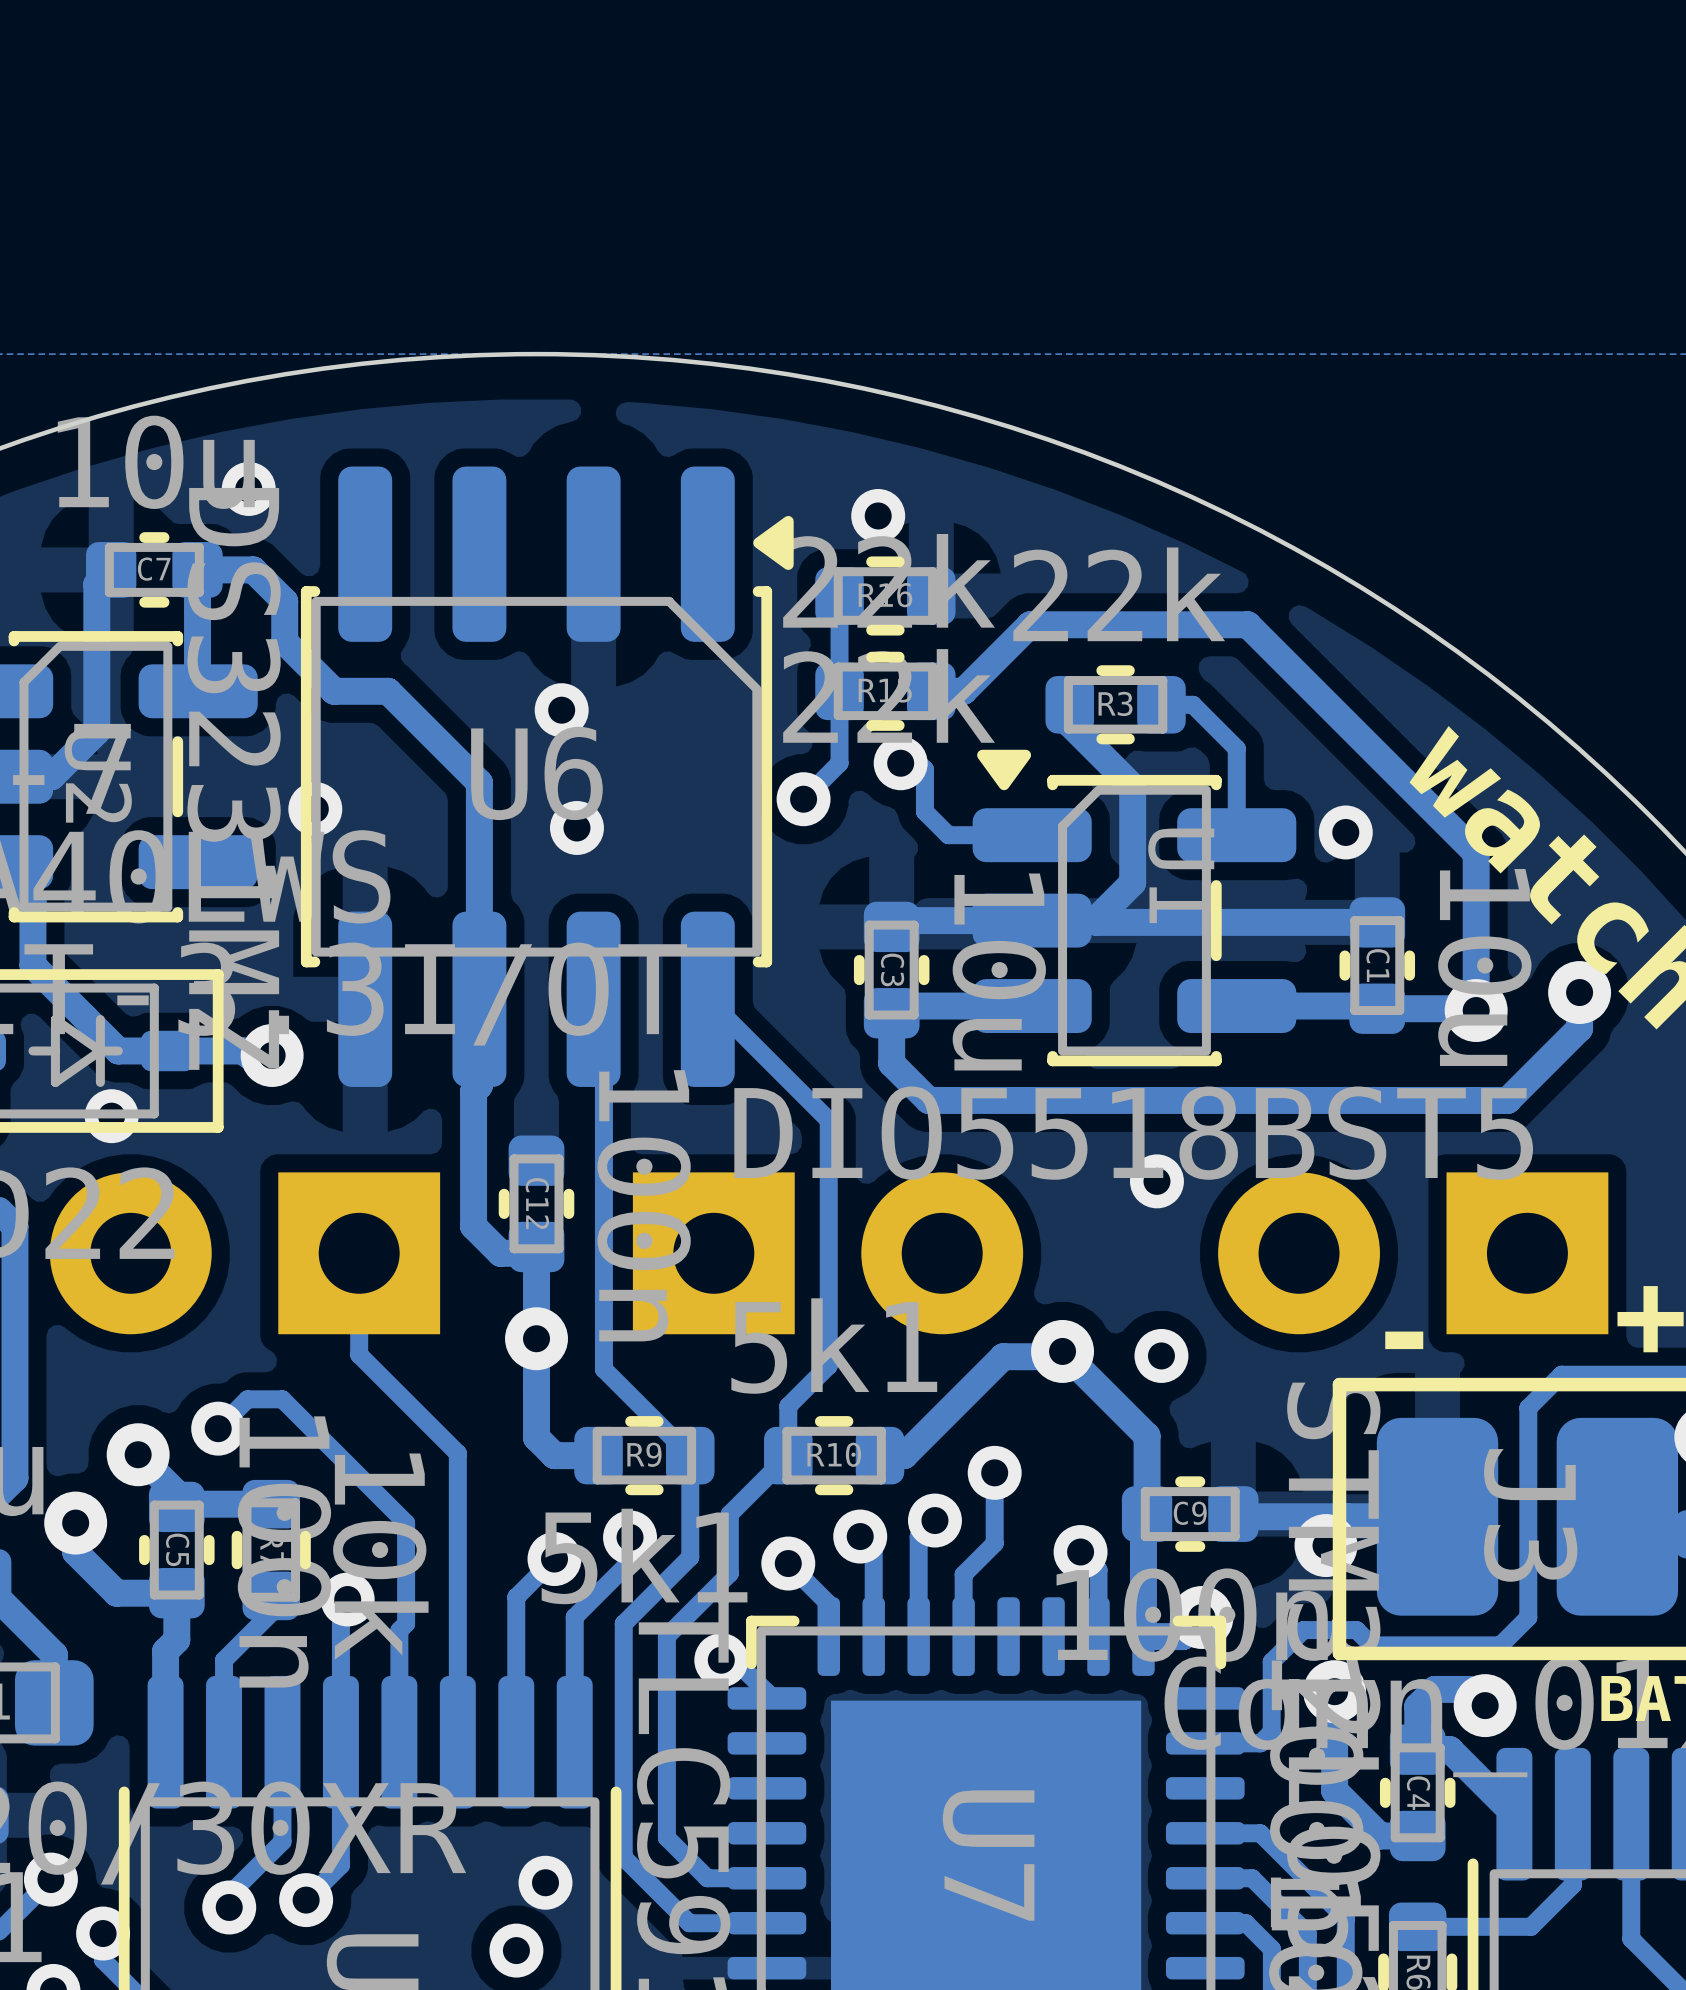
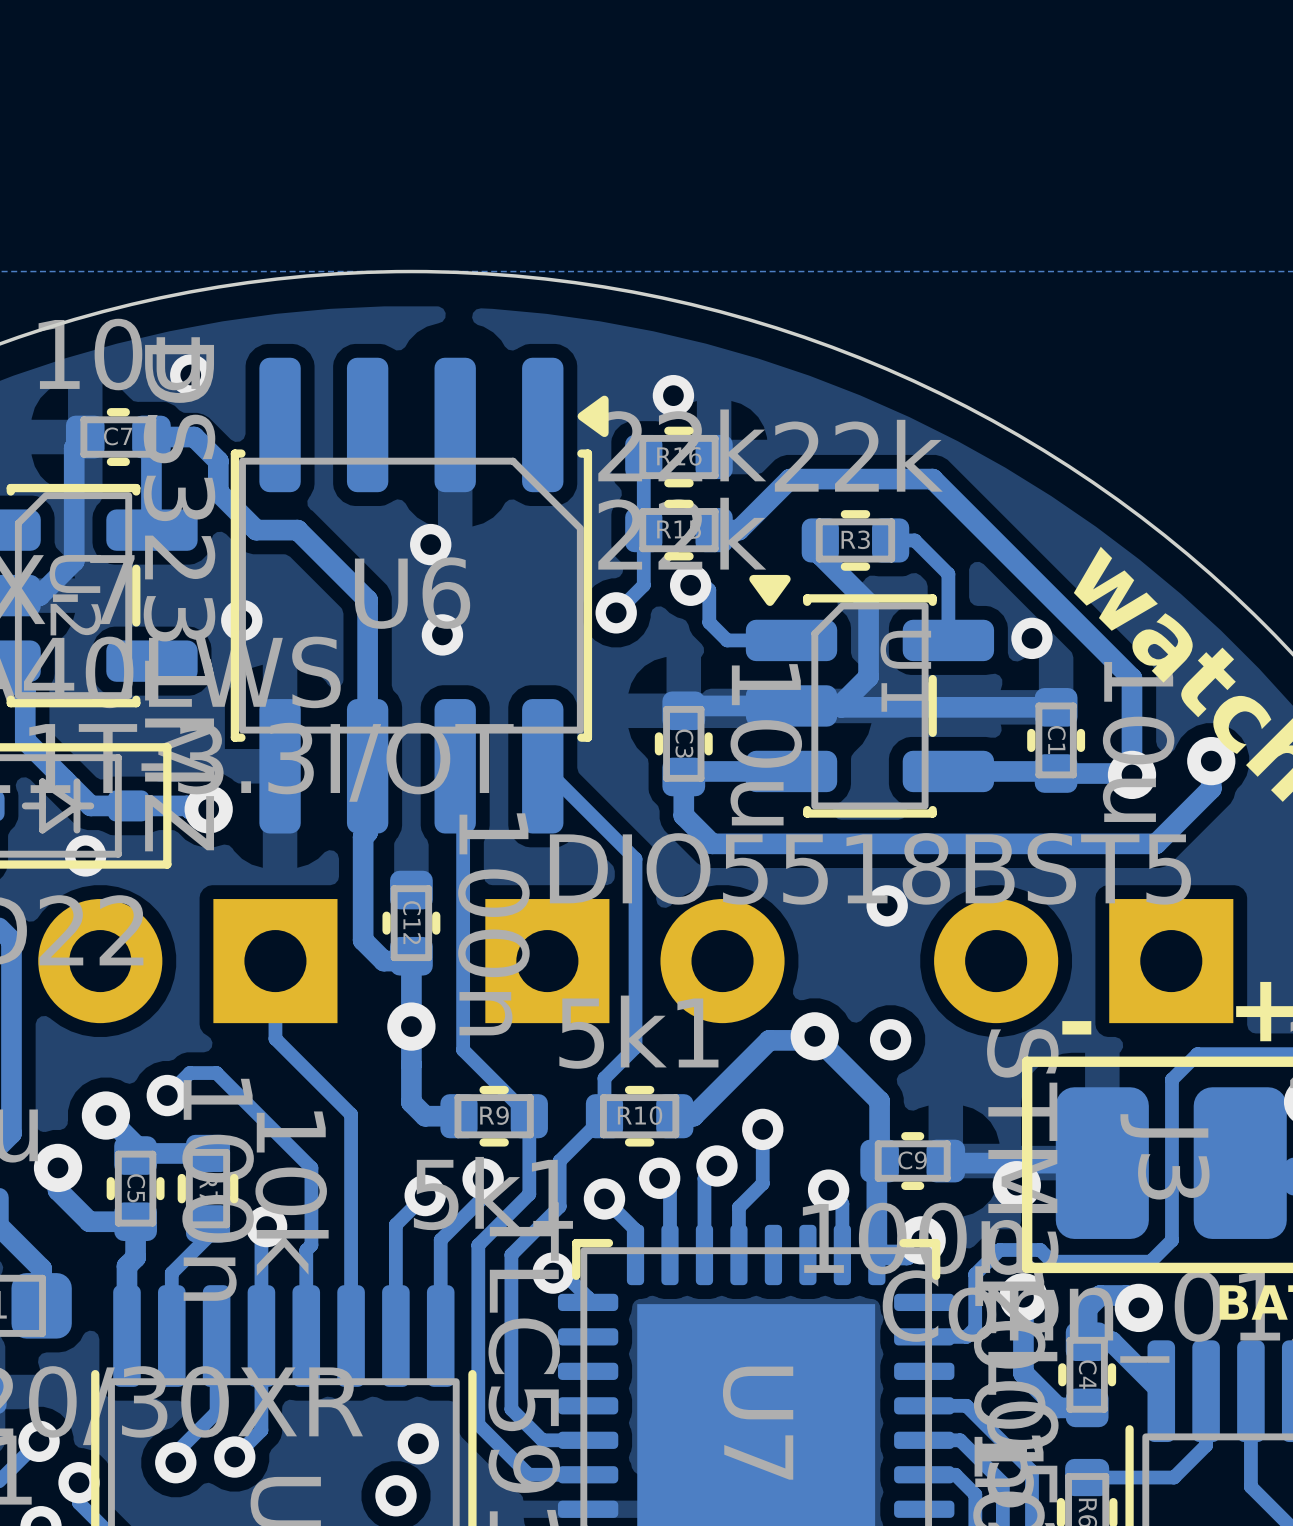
track: (1216, 624) (1247, 624) (1476, 853) (1476, 884) -> (932, 479) (1131, 678)

